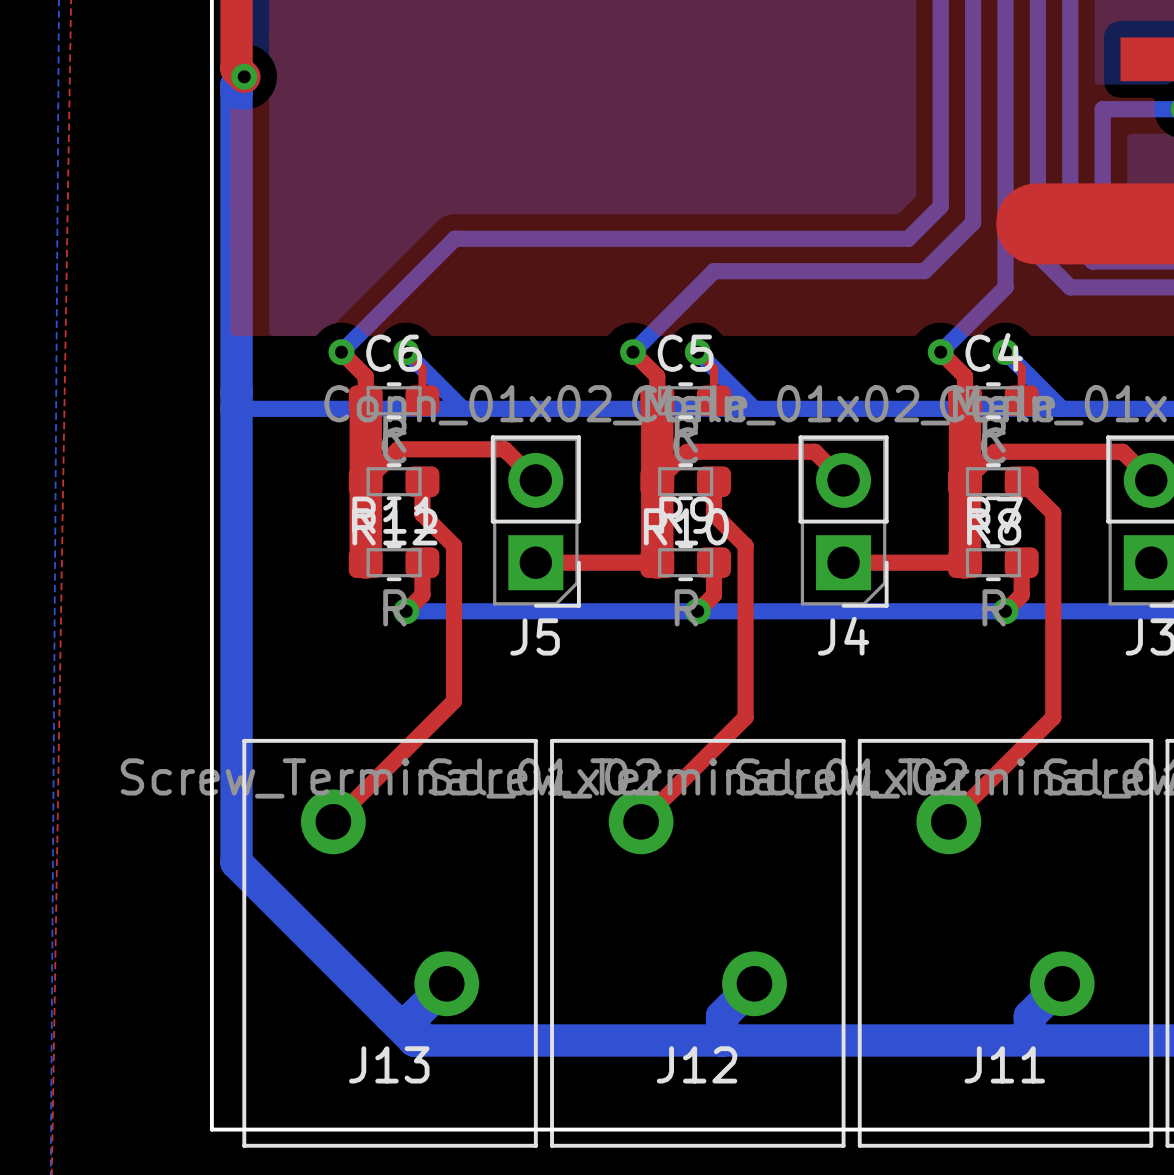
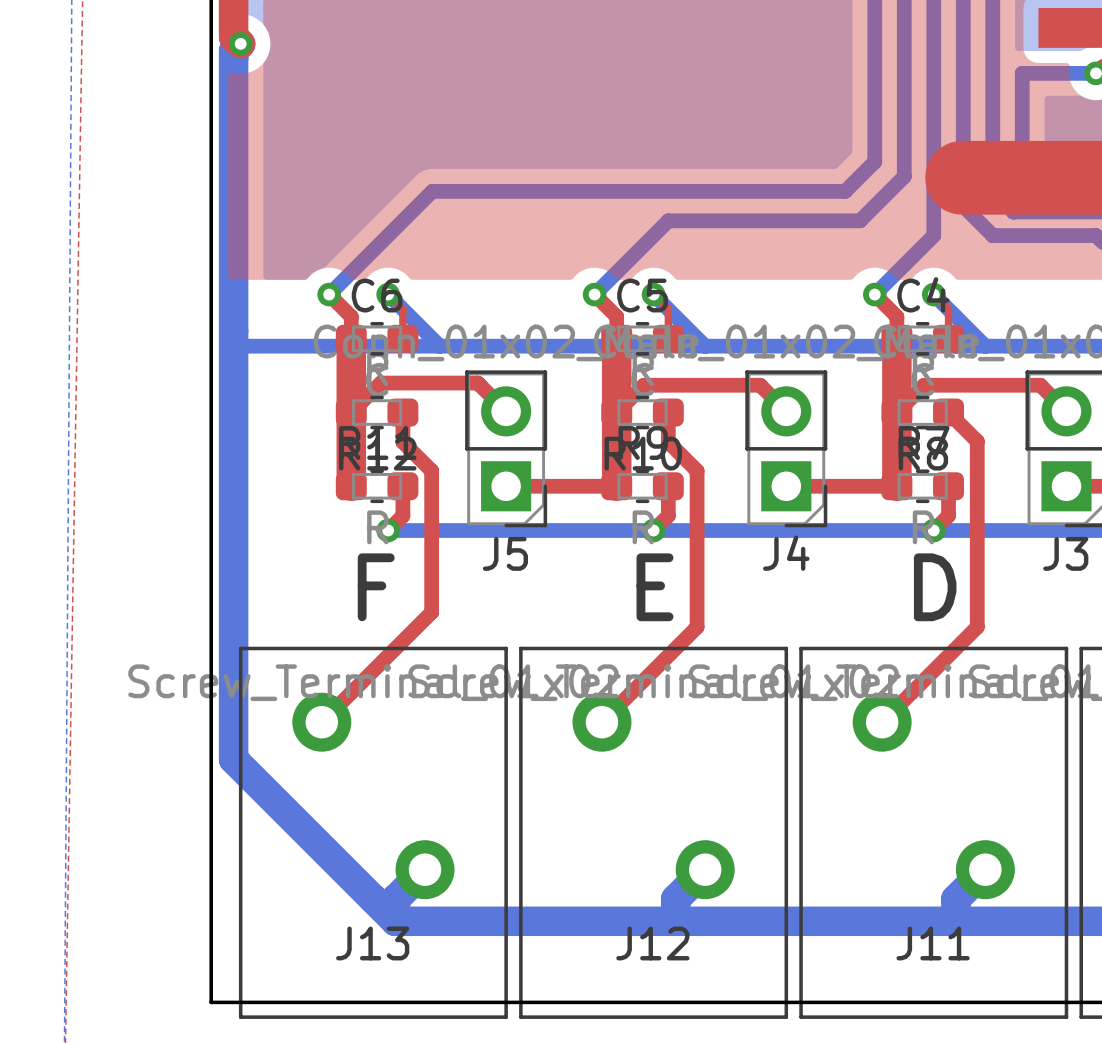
text: none -> F (376, 587)
text: none -> E (654, 587)
text: none -> D (935, 587)

